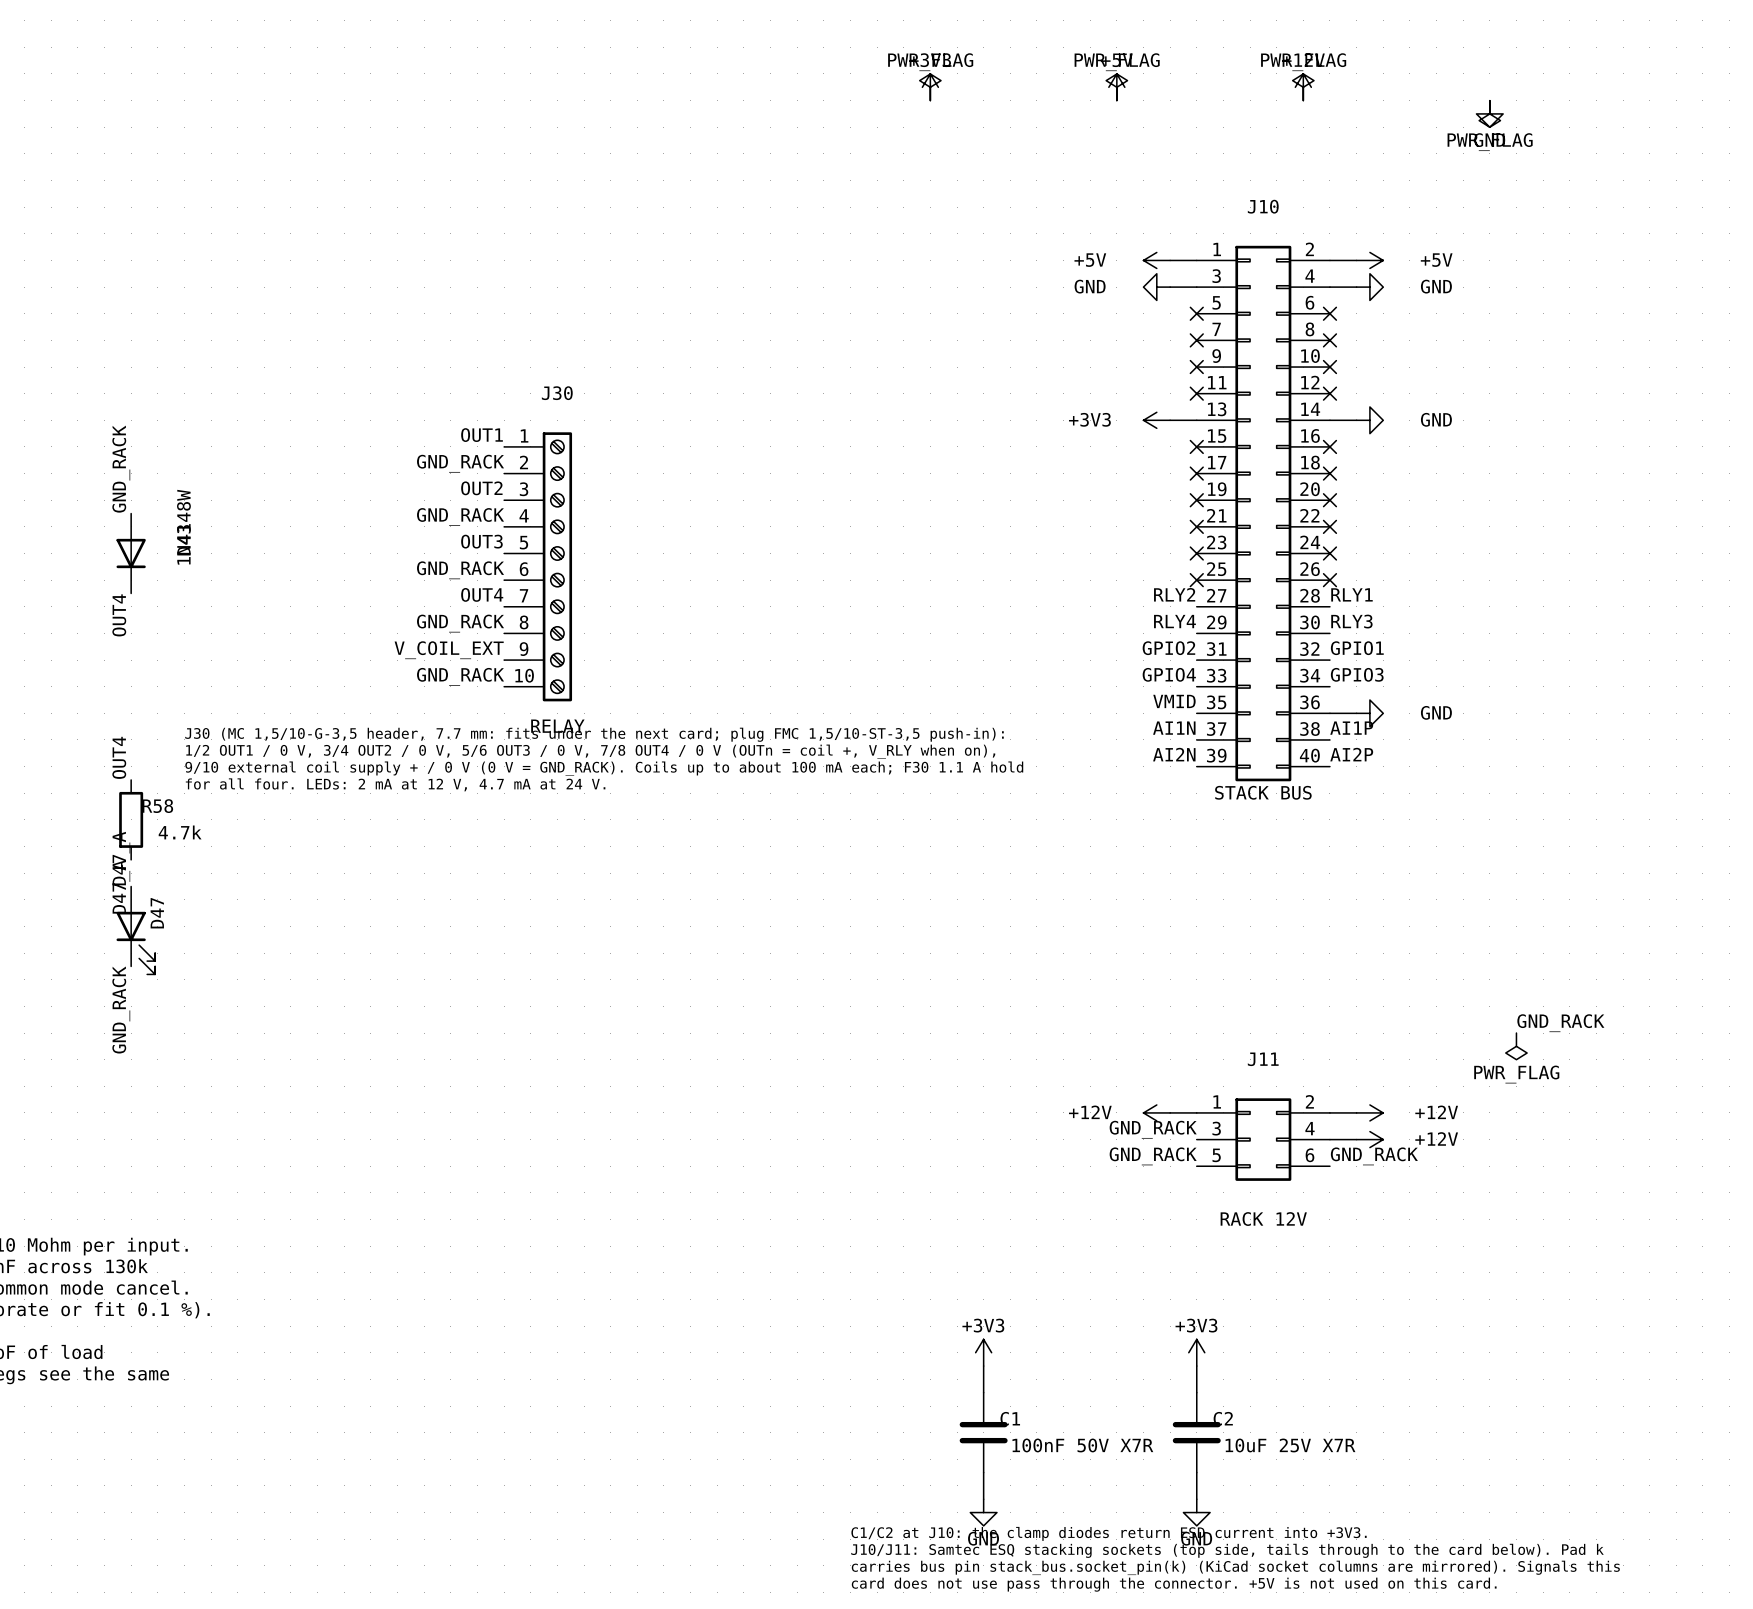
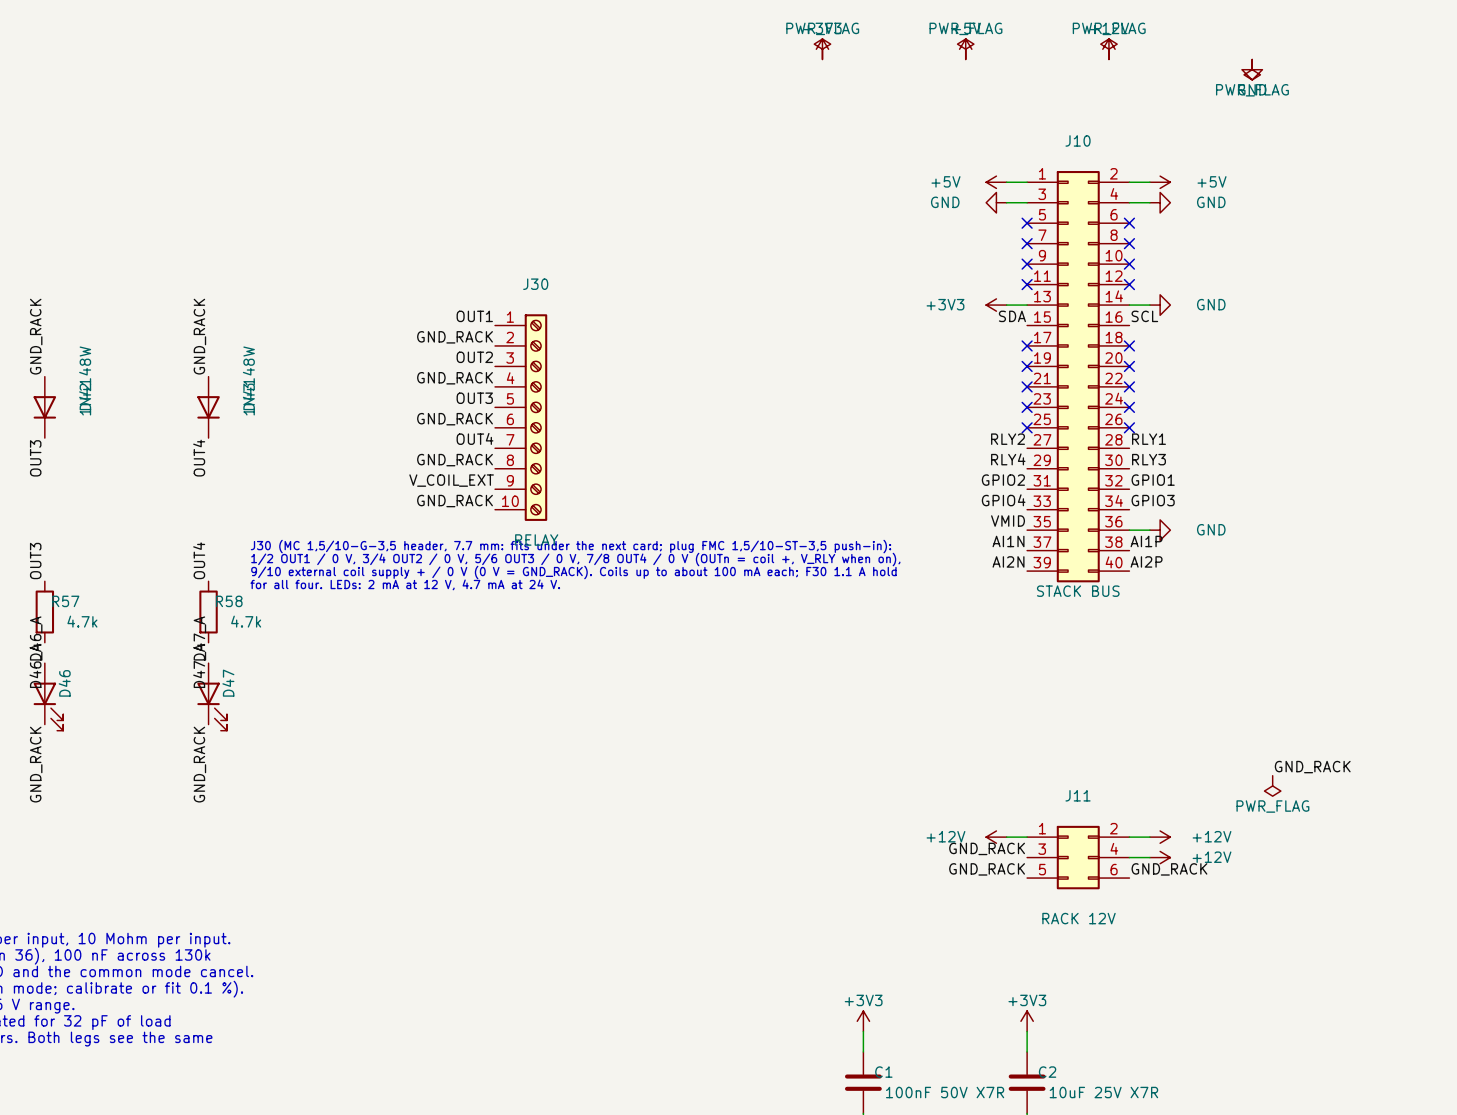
label: none -> SDA (1012, 316)
label: none -> SCL (1144, 316)
no-connect mark: (1196, 446) -> none
no-connect mark: (1329, 446) -> none

